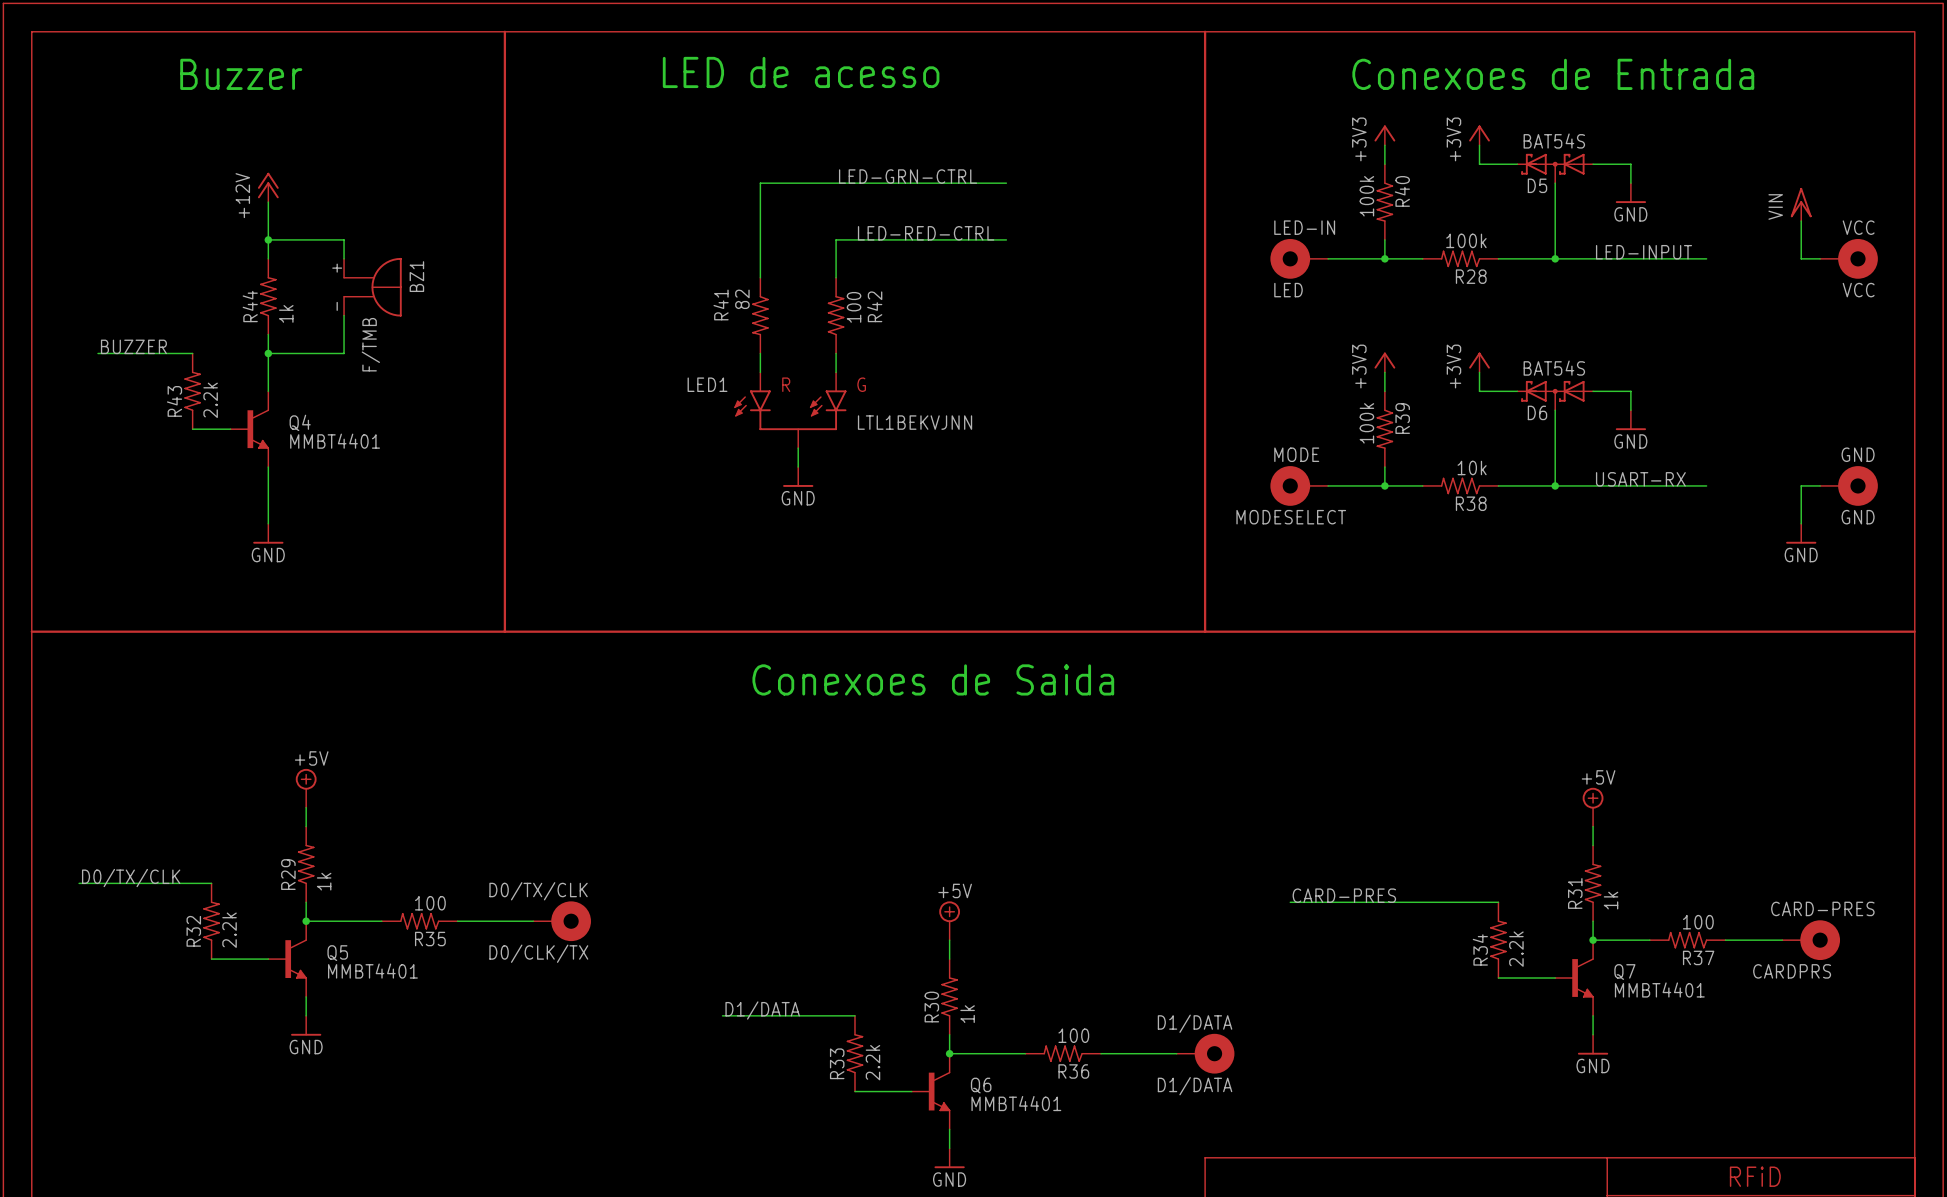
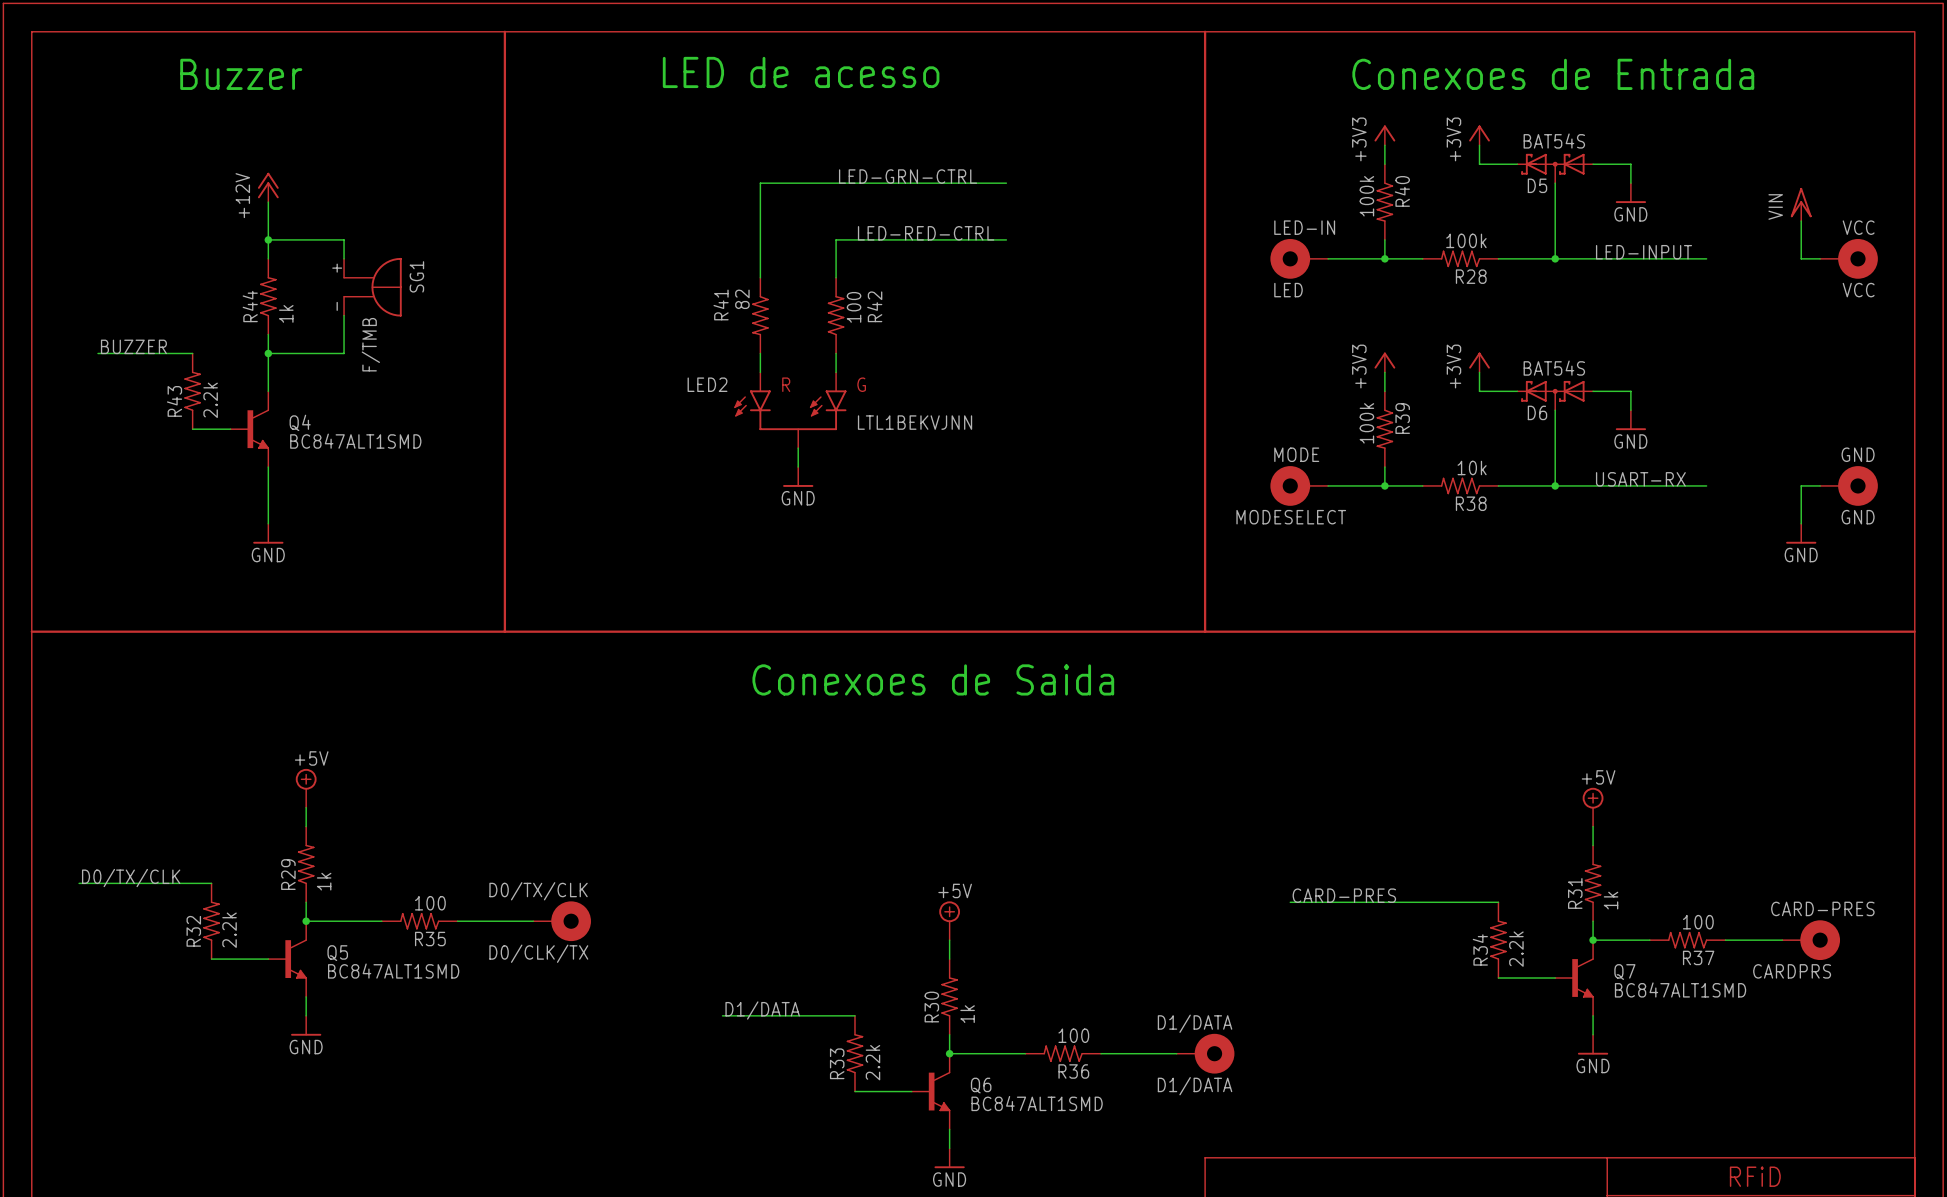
BZ1 name: BZ1 (416, 276) -> SG1 (416, 276)
LED1 name: LED1 (707, 384) -> LED2 (707, 384)
Q4 value: MMBT4401 (335, 441) -> BC847ALT1SMD (355, 441)
Q5 value: MMBT4401 (372, 971) -> BC847ALT1SMD (393, 971)
Q7 value: MMBT4401 (1659, 989) -> BC847ALT1SMD (1680, 989)
Q6 value: MMBT4401 (1016, 1103) -> BC847ALT1SMD (1037, 1103)

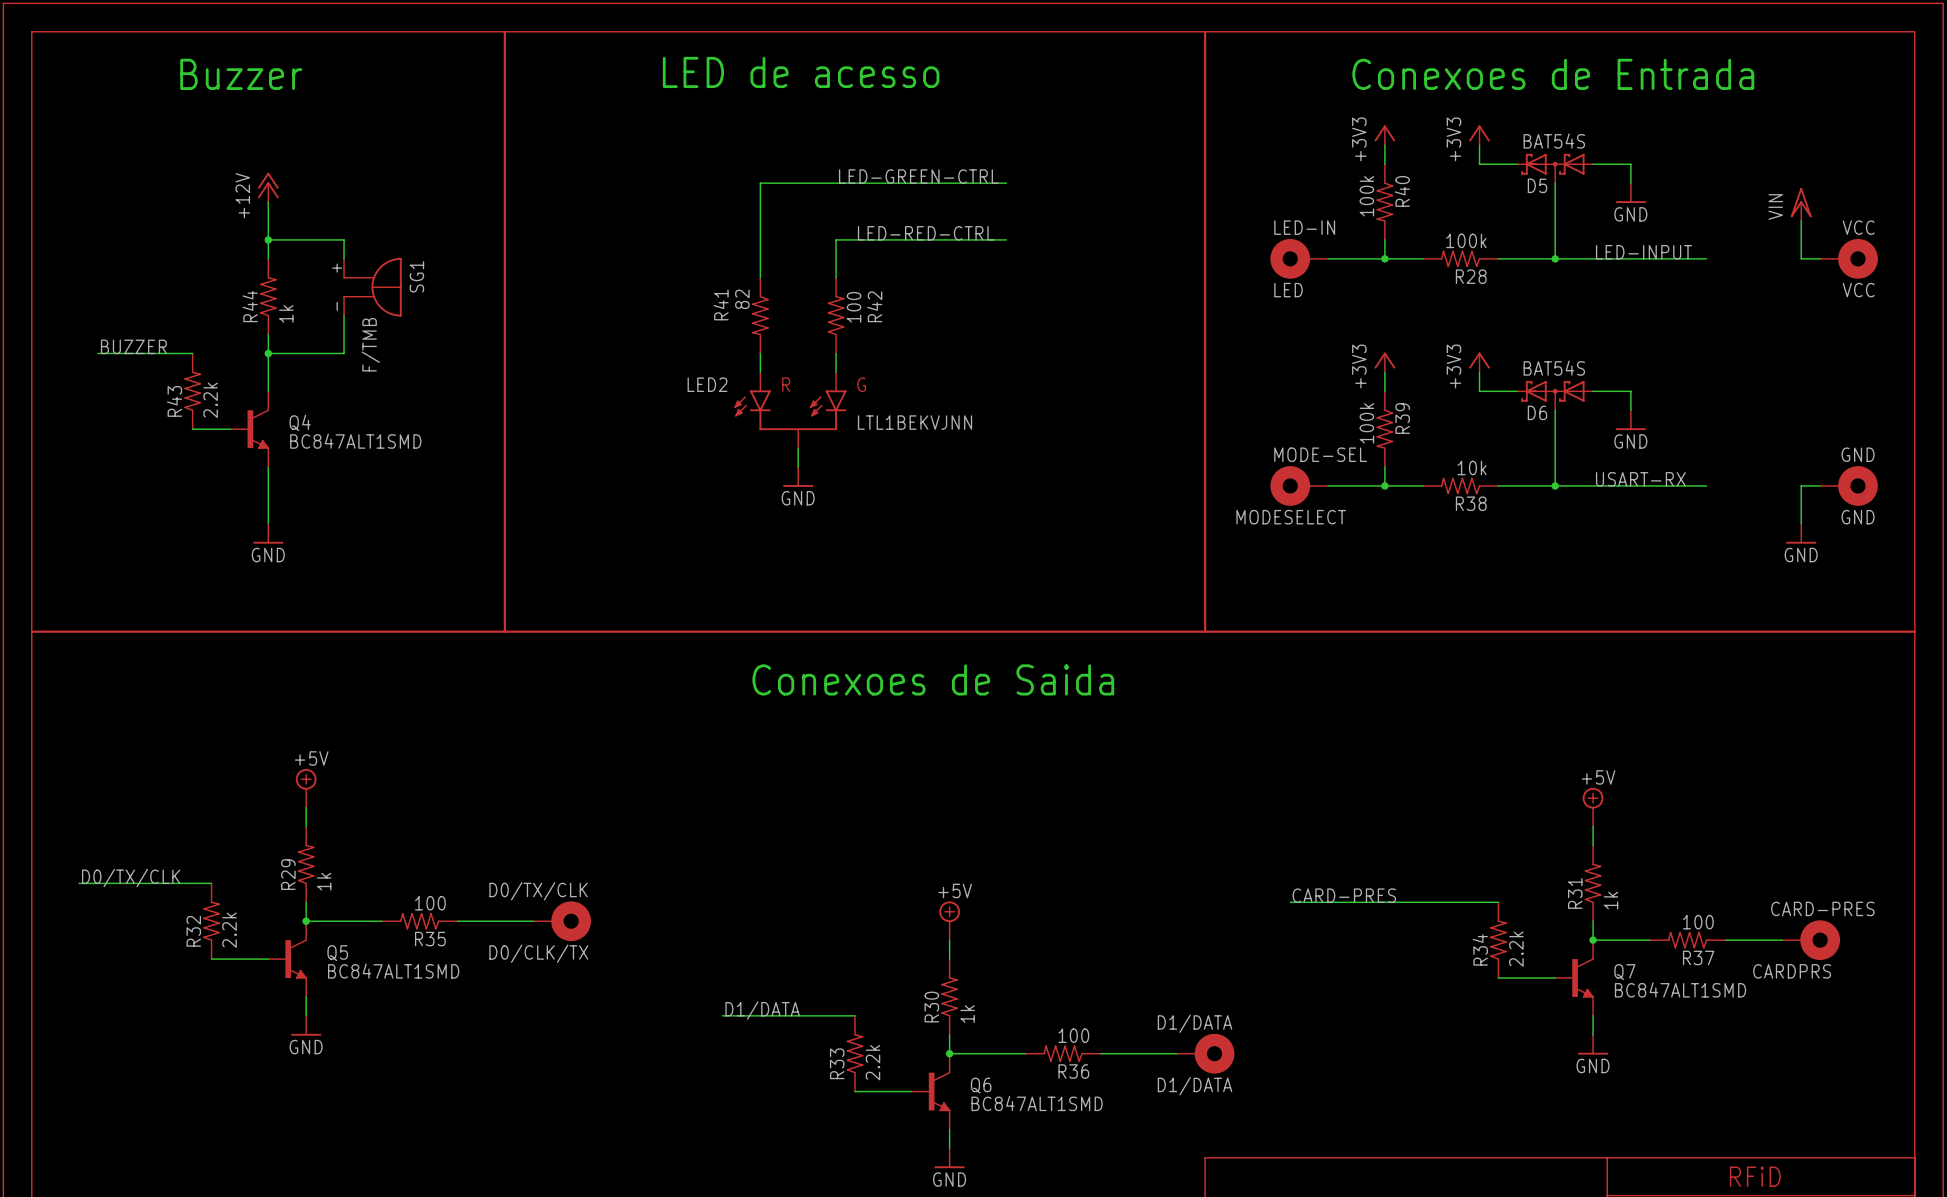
label: LED-GRN-CTRL (908, 176) -> LED-GREEN-CTRL (918, 176)
MODE name: MODE (1296, 454) -> MODE-SEL (1320, 454)

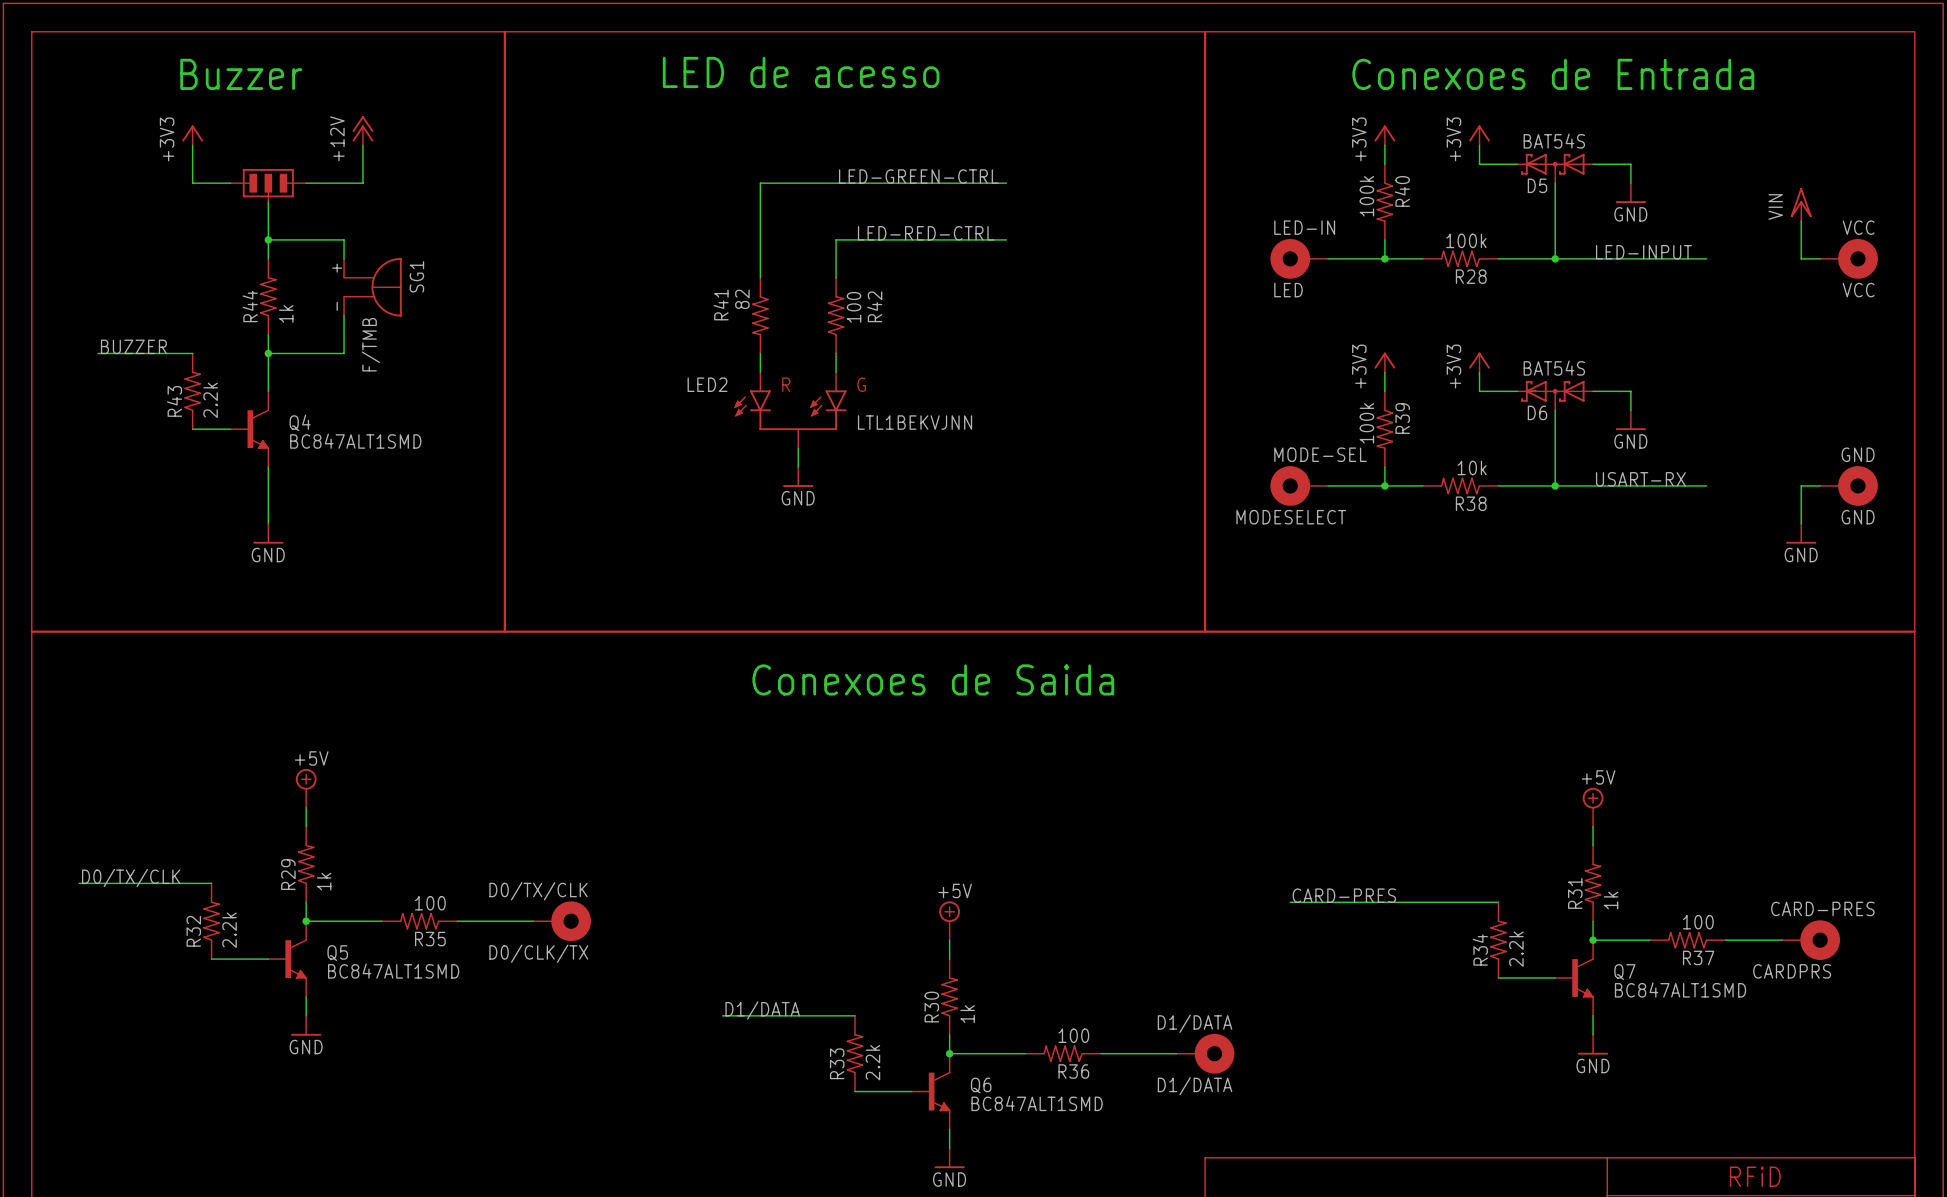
power symbol: none -> +3V3 (192, 135)
wire: none -> (192, 145) (192, 183) (230, 183)
wire: none -> (362, 145) (362, 183) (306, 183)
part: none -> (268, 185)
power symbol position: +12V (268, 187) -> +12V (362, 130)

